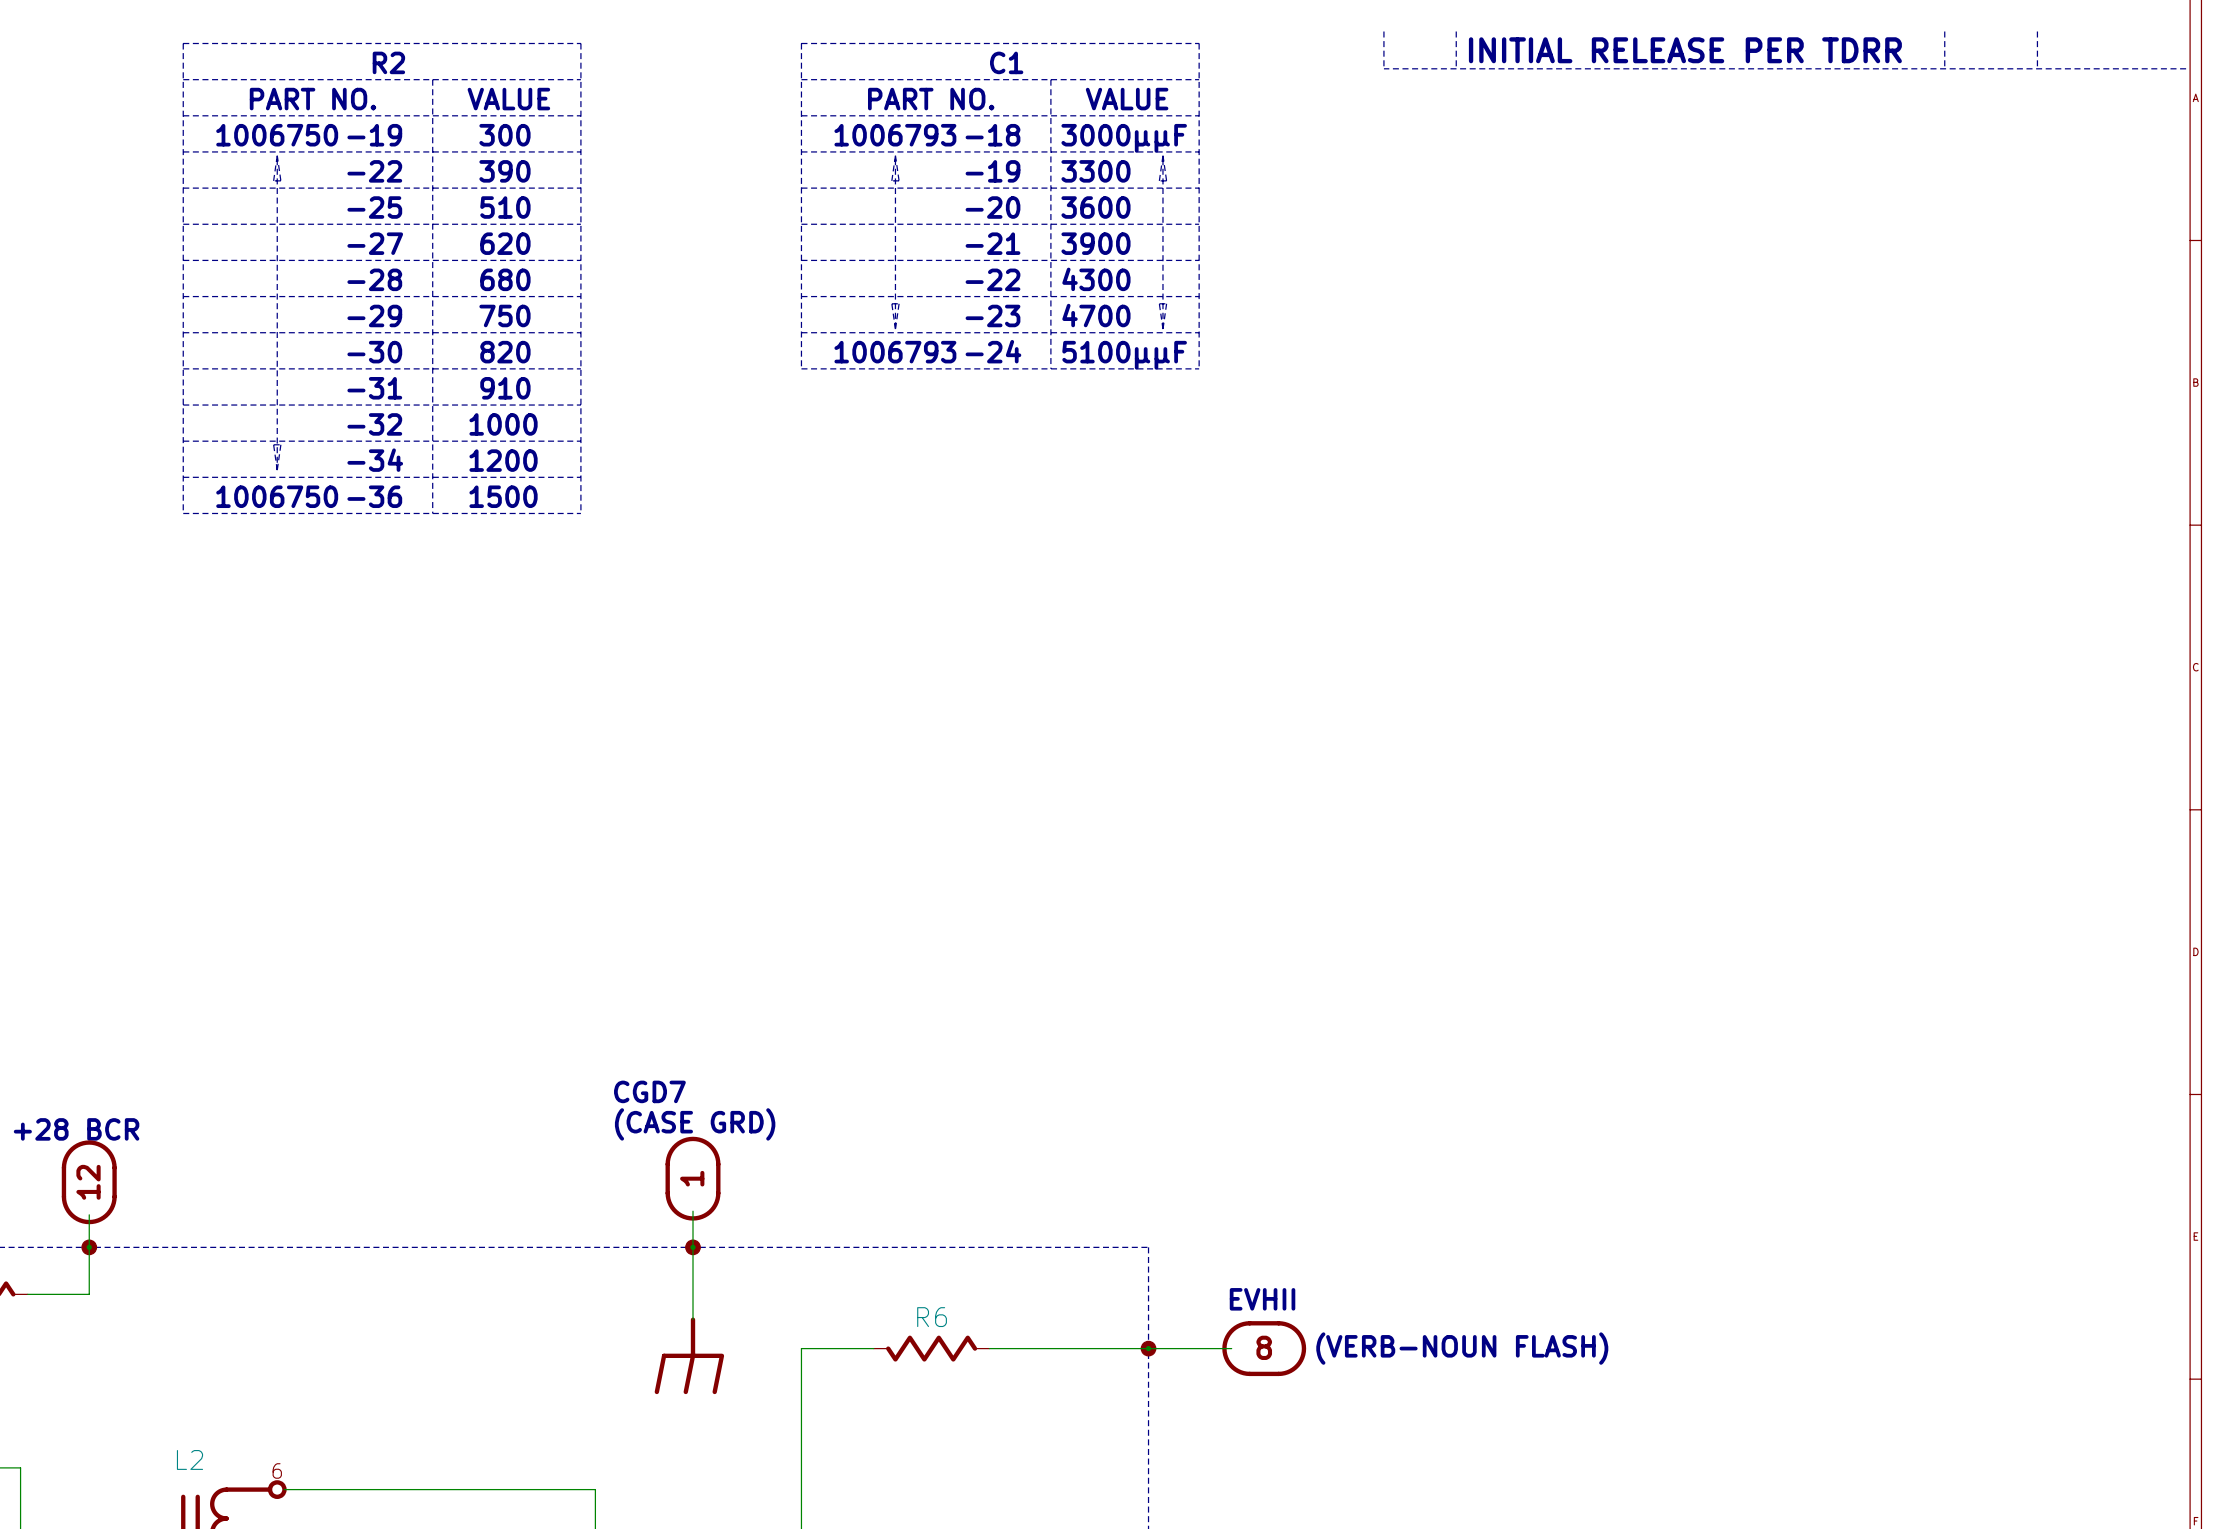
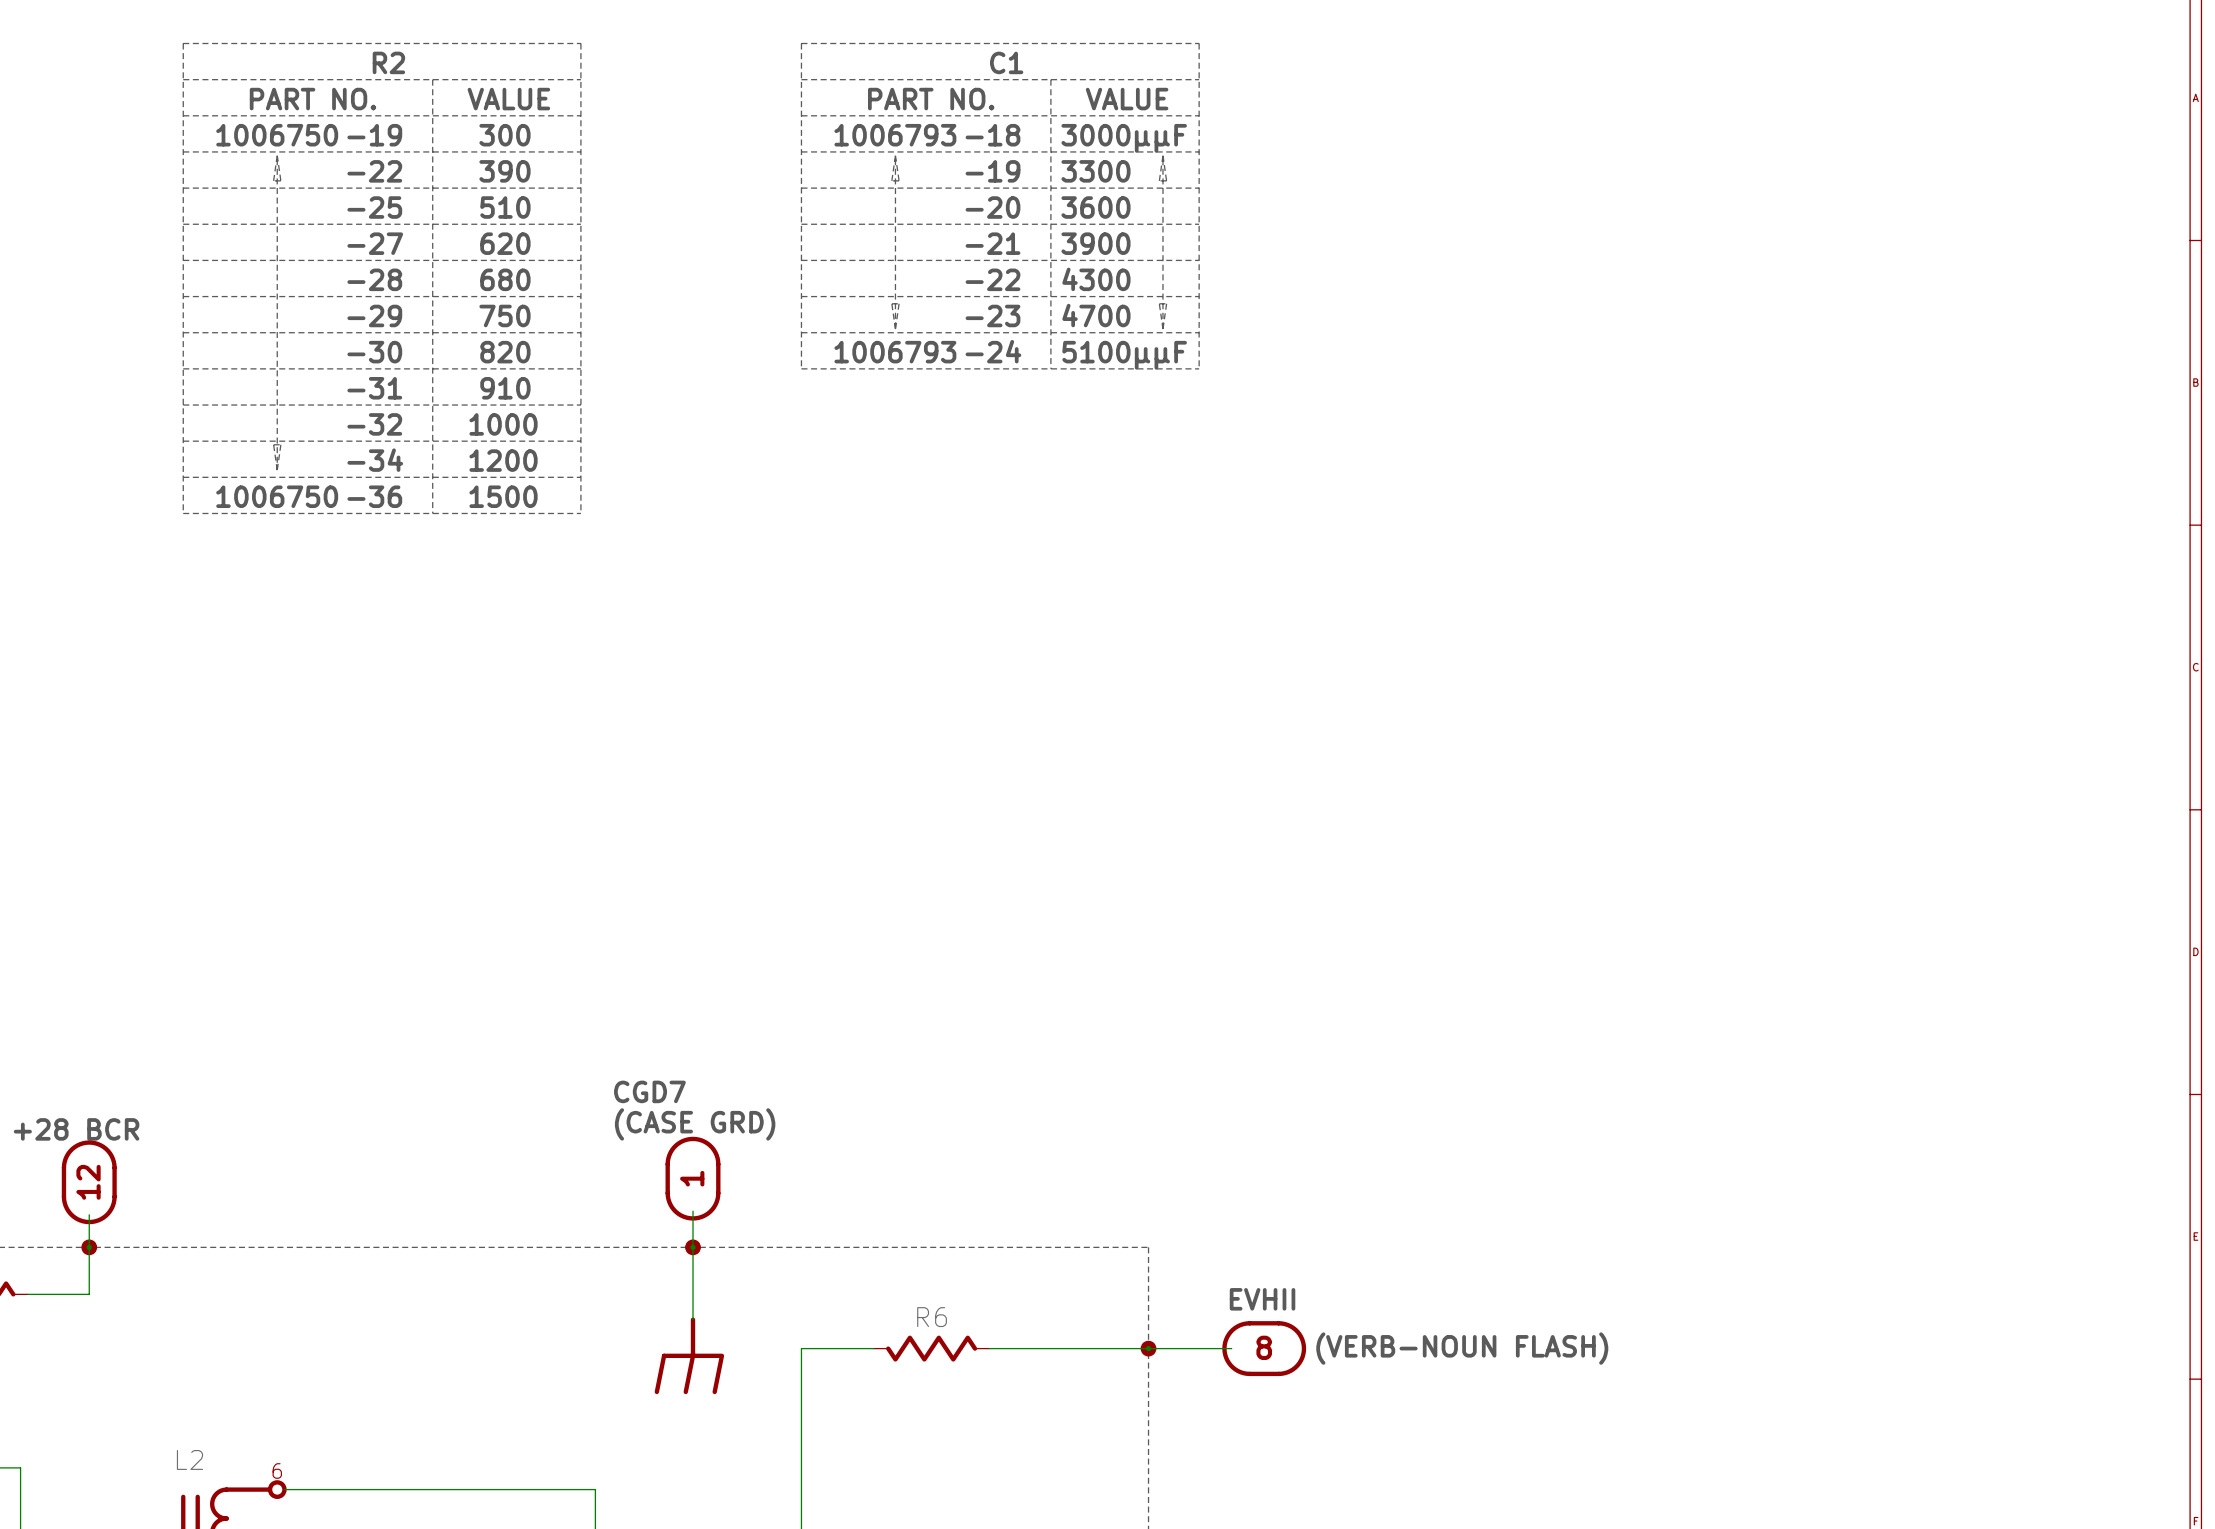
line: (1383, 31) (1383, 68) (2186, 68) -> none
line: (1456, 31) (1456, 68) -> none
line: (1944, 31) (1944, 68) -> none
line: (2037, 31) (2037, 68) -> none
text: INITIAL RELEASE PER TDRR (1685, 50) -> none

